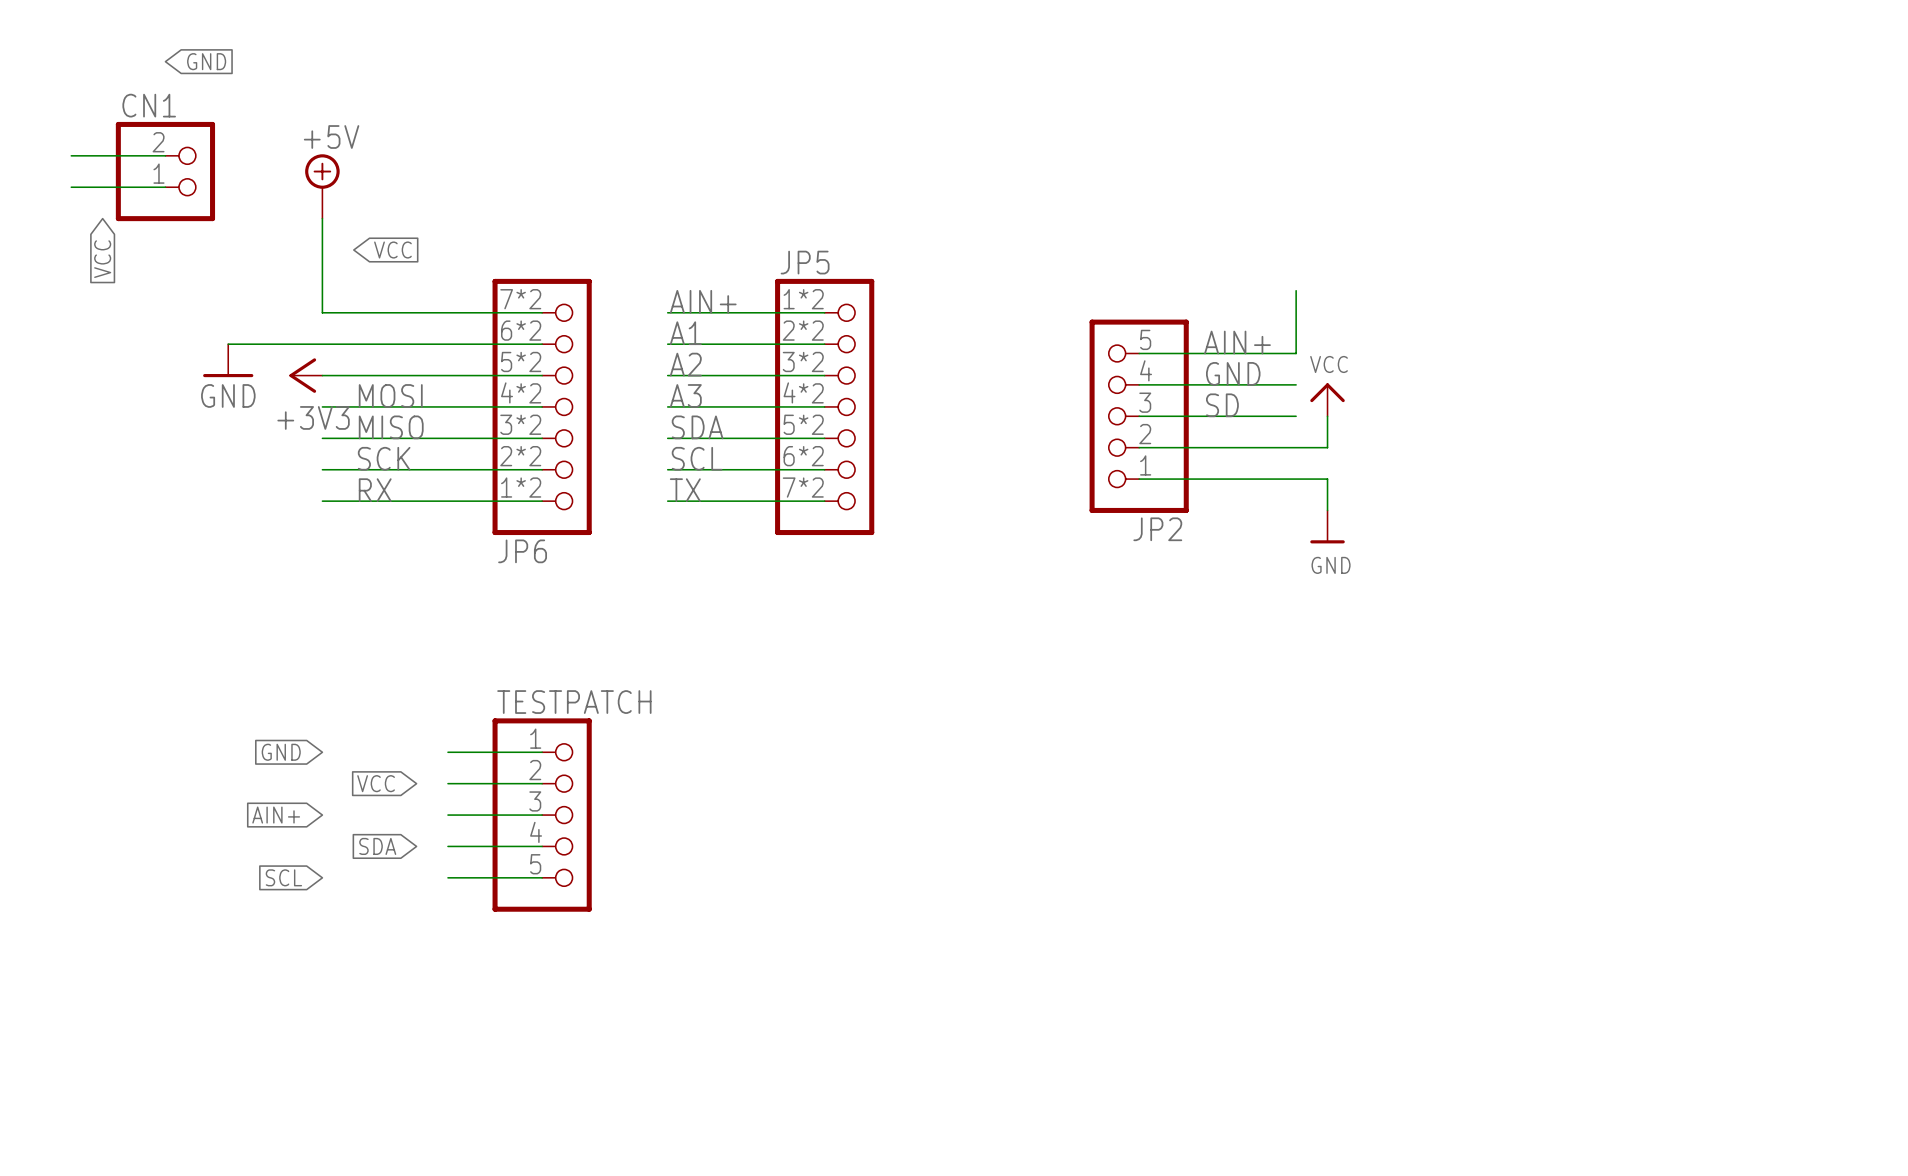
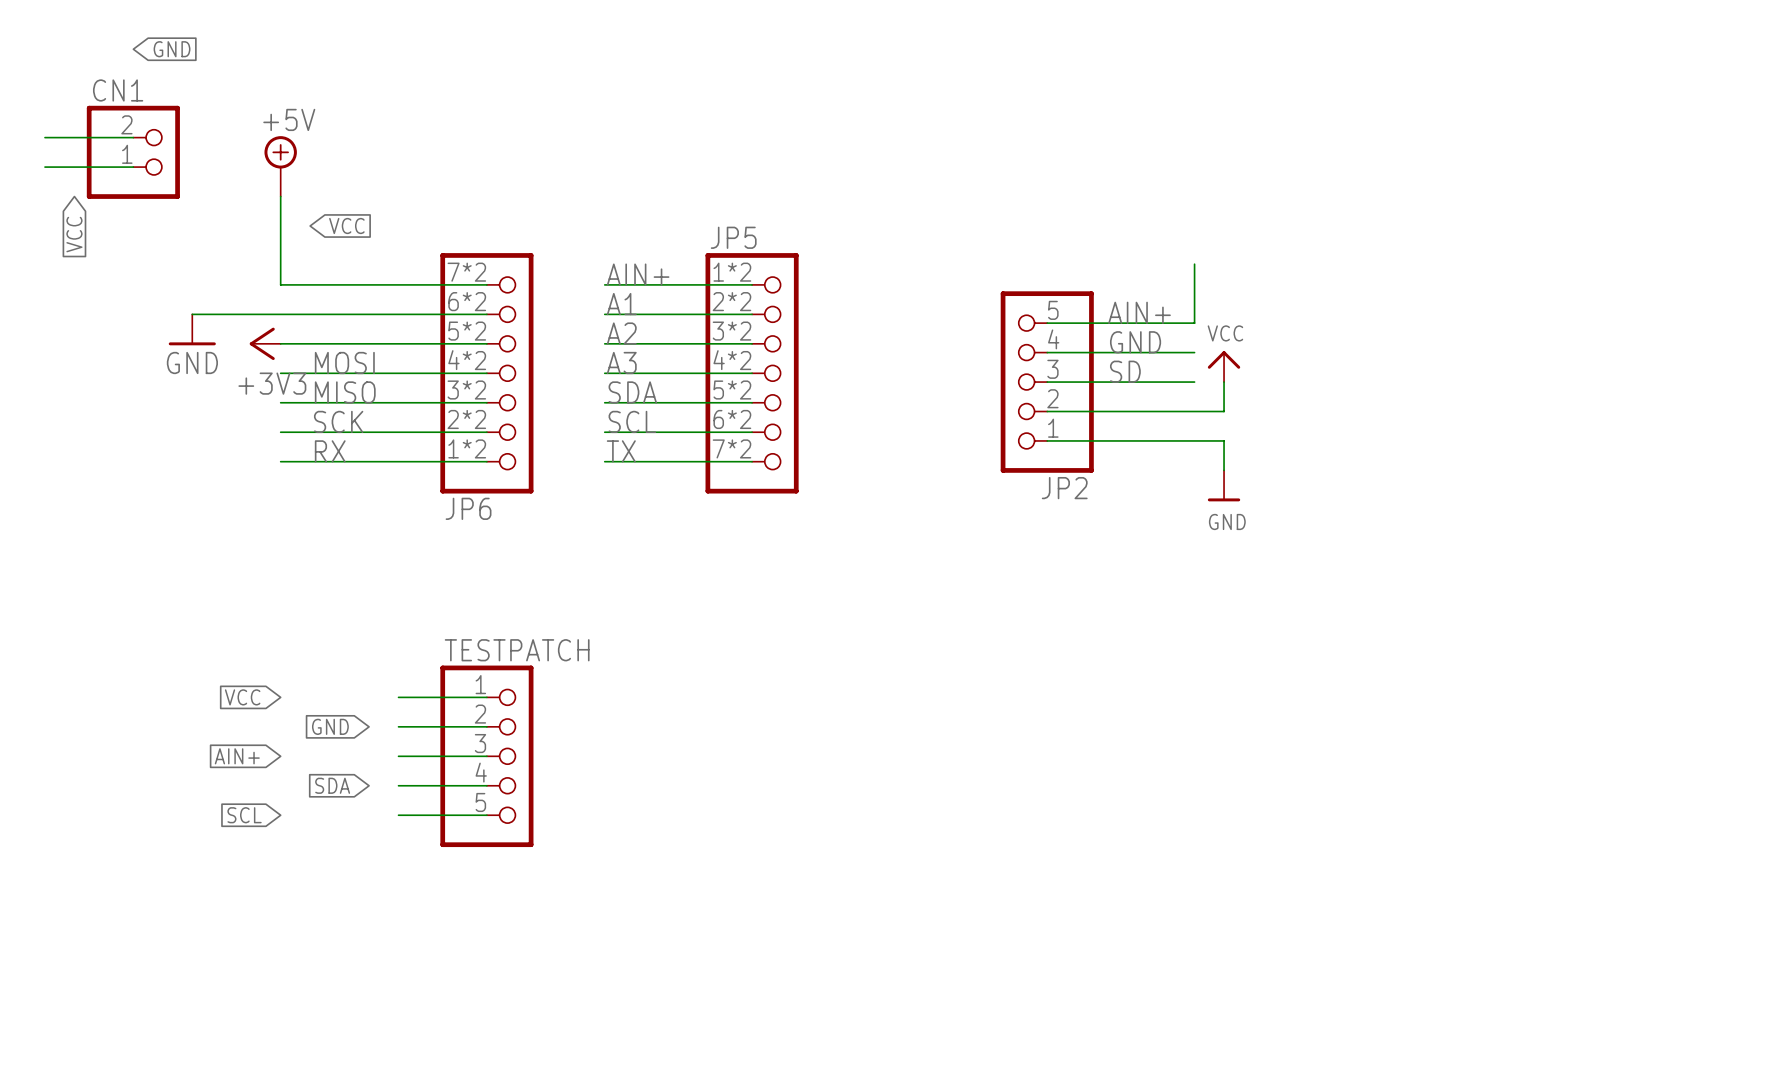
global label: GND (281, 752) -> VCC (242, 697)
global label: VCC (376, 783) -> GND (330, 726)

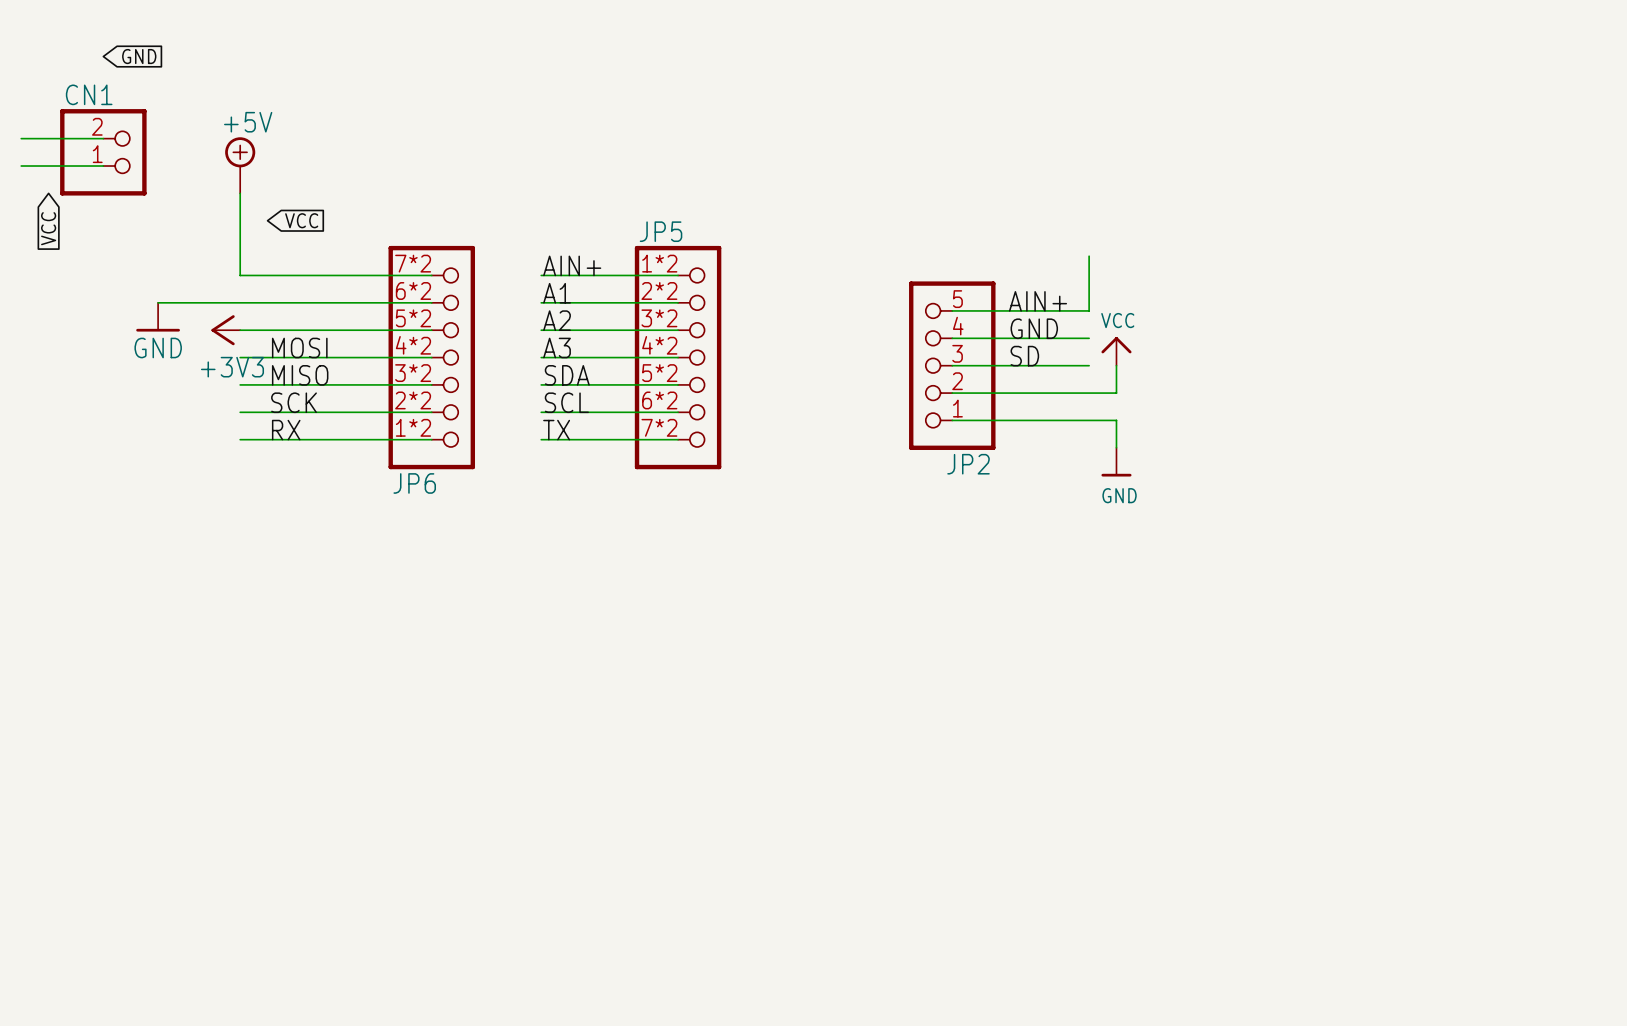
global label: VCC (242, 697) -> none
wire: (398, 697) (486, 697) -> none
global label: GND (330, 726) -> none
wire: (398, 726) (486, 726) -> none
global label: AIN+ (237, 756) -> none
wire: (398, 756) (486, 756) -> none
TESTPATCH: (486, 756) -> none
global label: SDA (332, 785) -> none
wire: (398, 785) (486, 785) -> none
global label: SCL (244, 815) -> none
wire: (398, 815) (486, 815) -> none

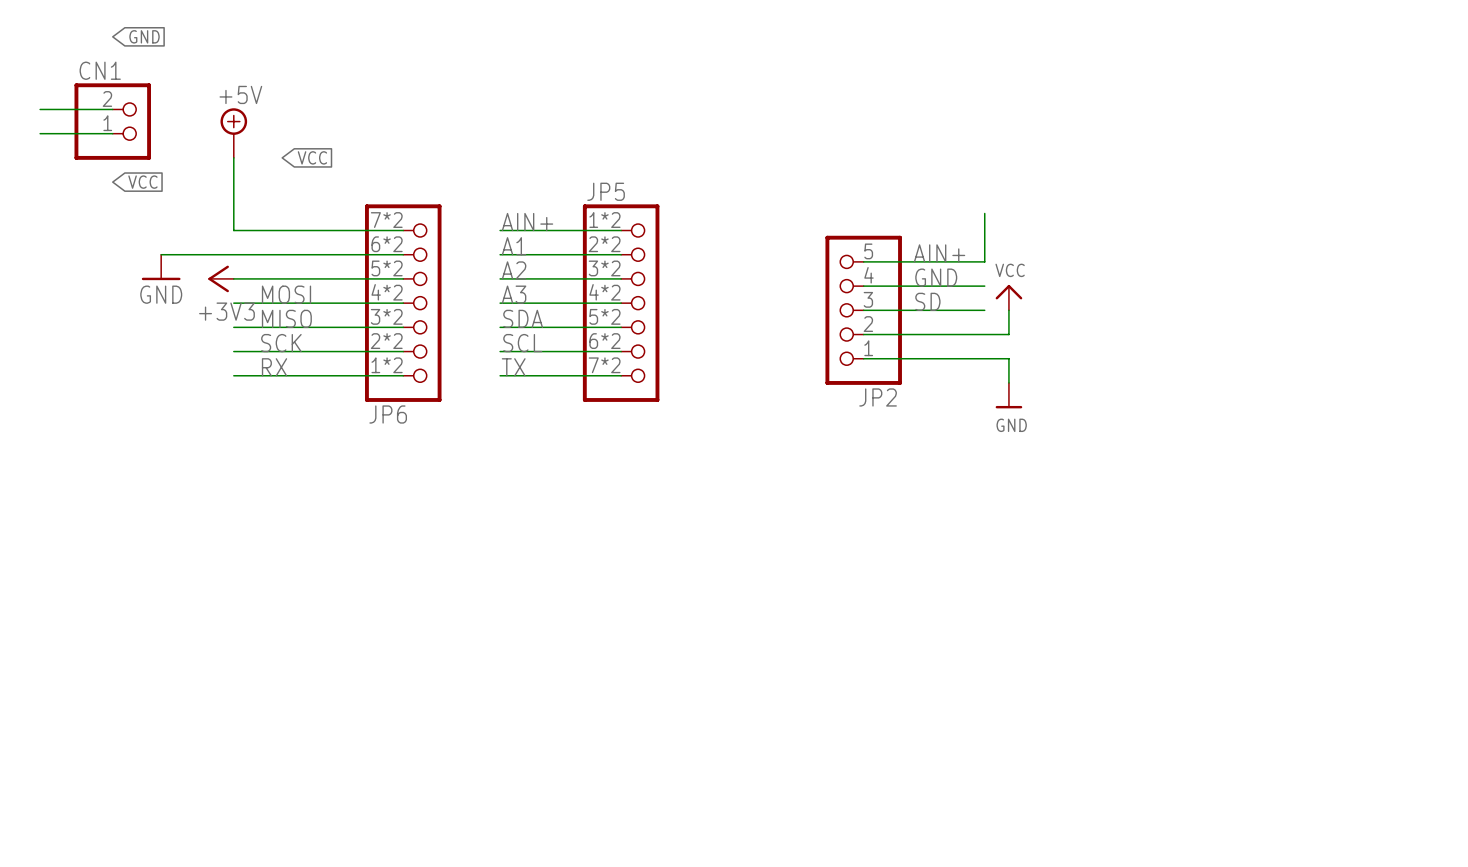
global label position: VCC (301, 220) -> VCC (312, 157)
global label rotation: 0° (48, 228) -> 90° counterclockwise (142, 182)
global label position: VCC (48, 228) -> VCC (142, 182)

